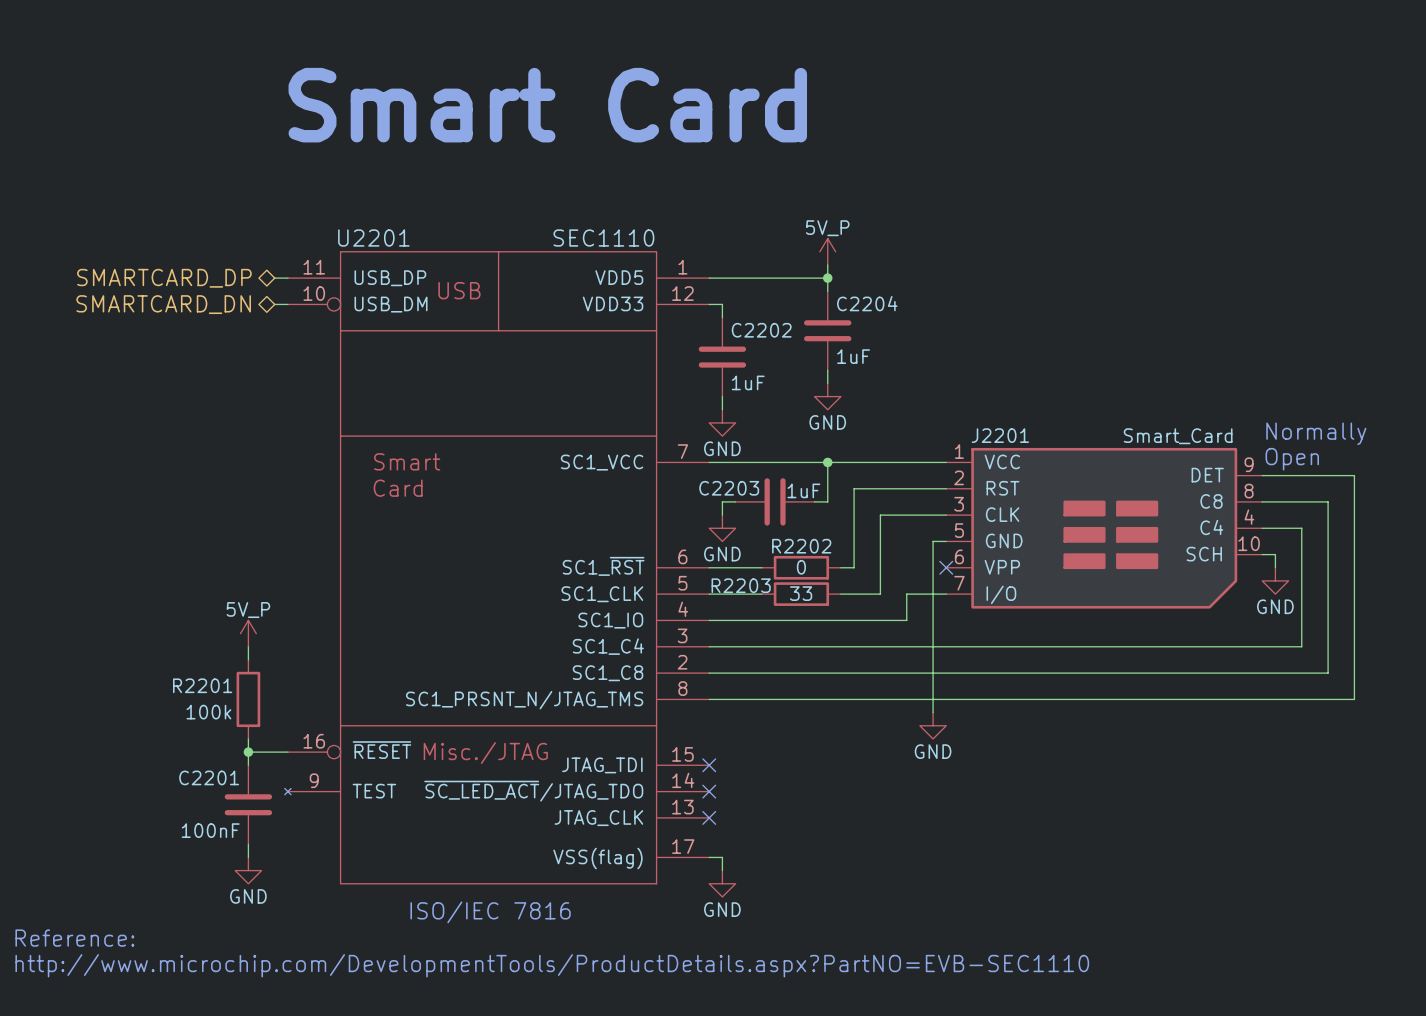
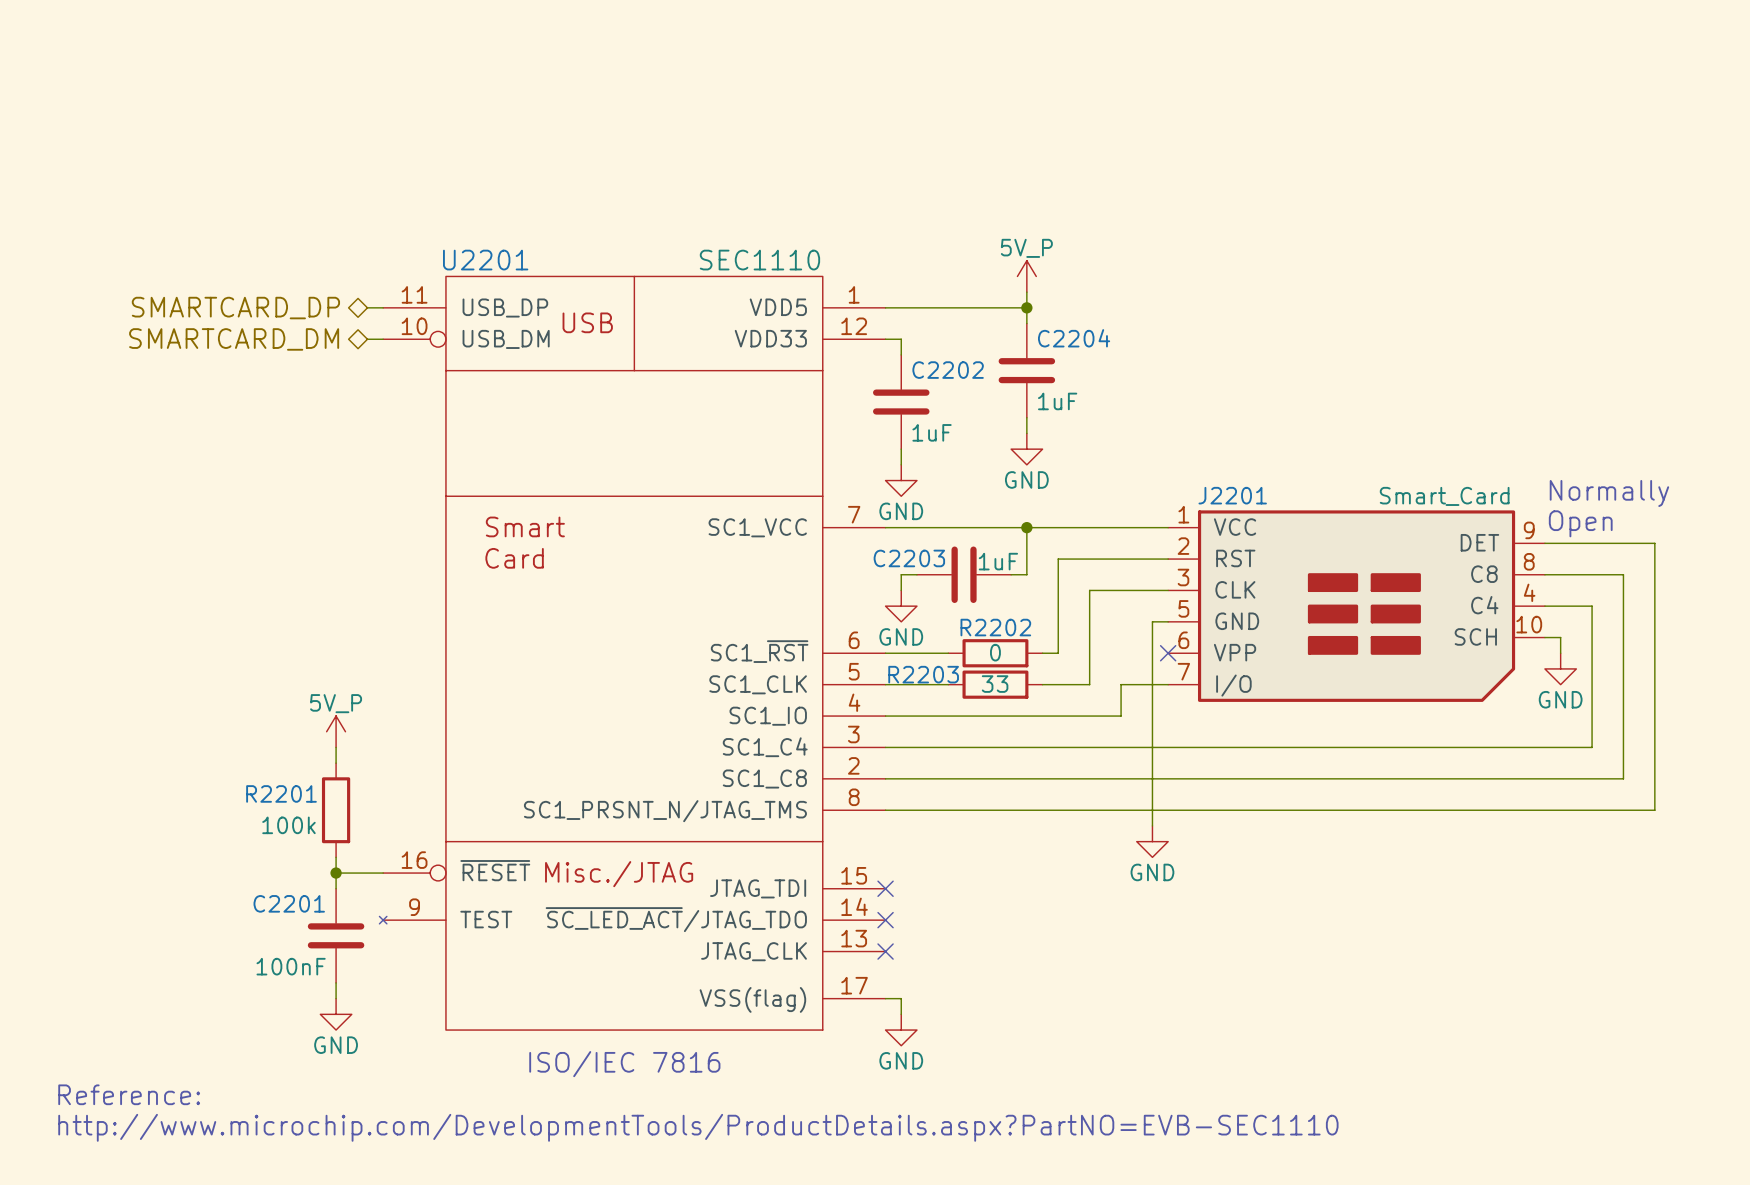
text: Smart Card (547, 105) -> none
hierarchical label: SMARTCARD_DN (163, 304) -> SMARTCARD_DM (234, 339)

